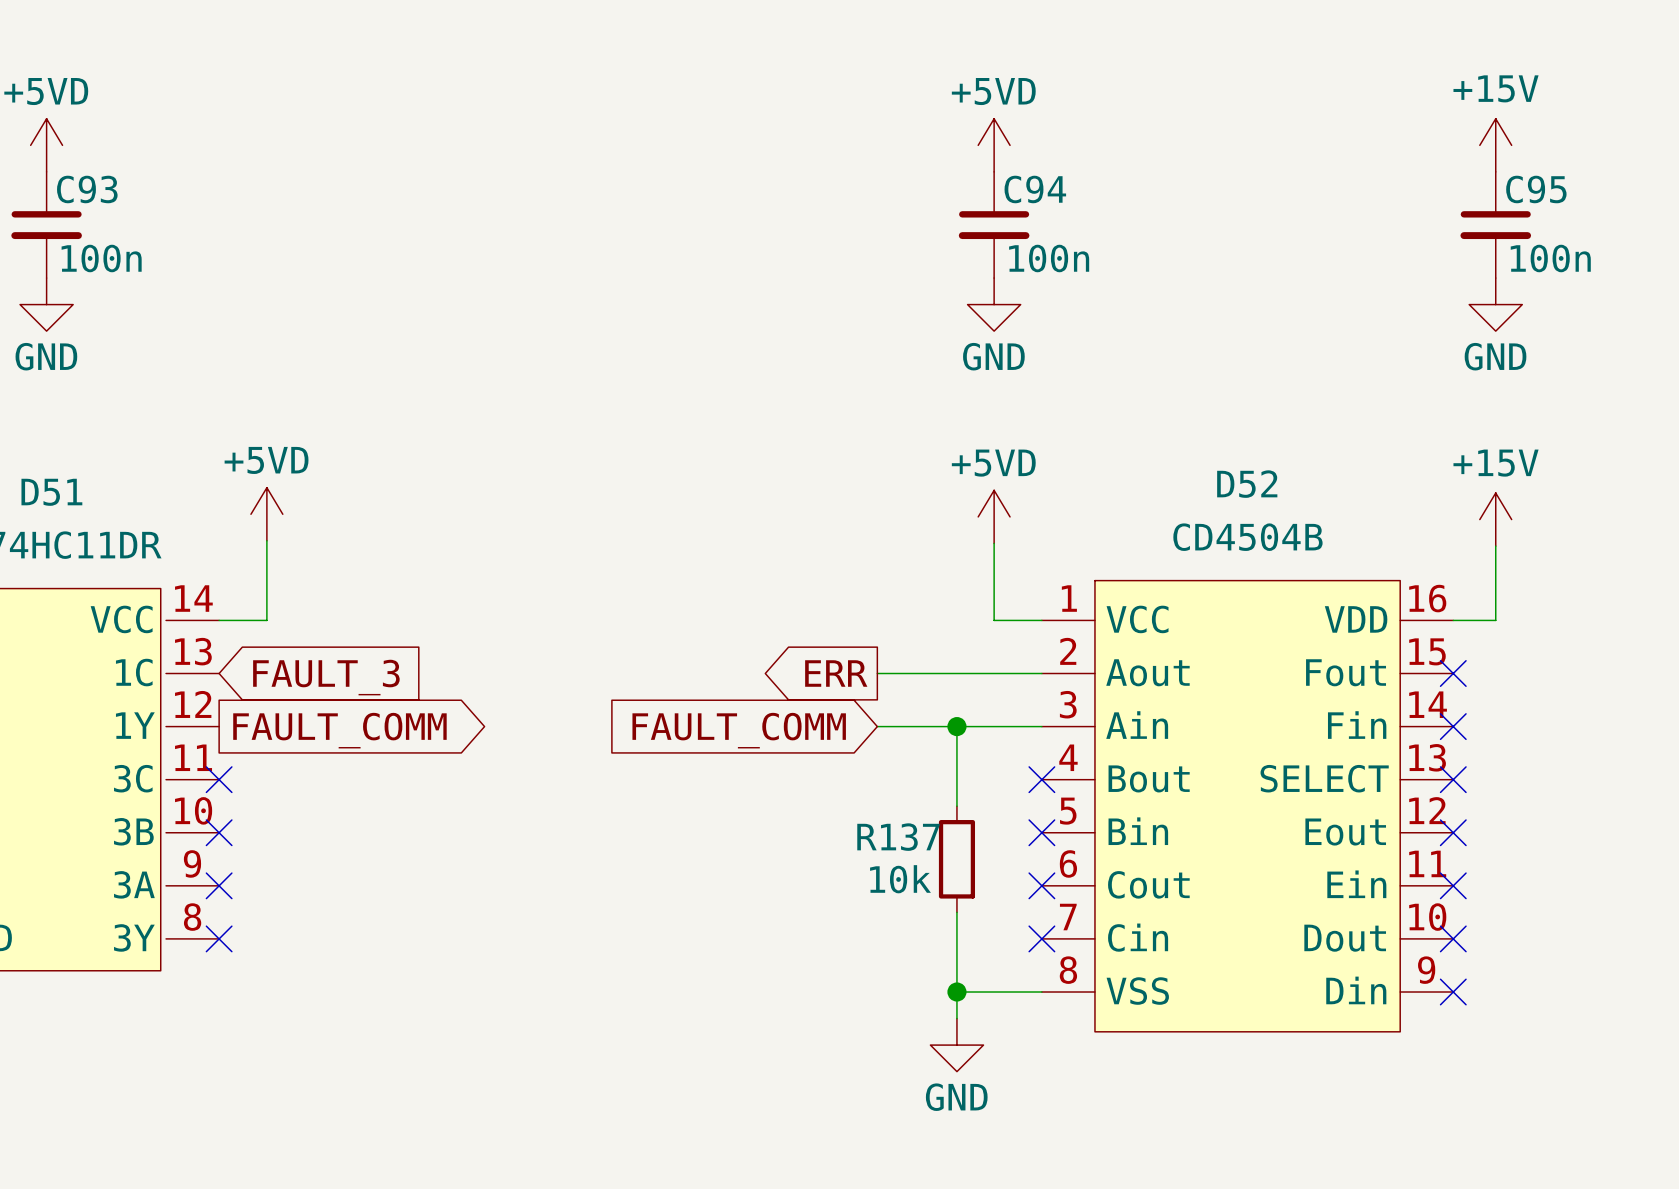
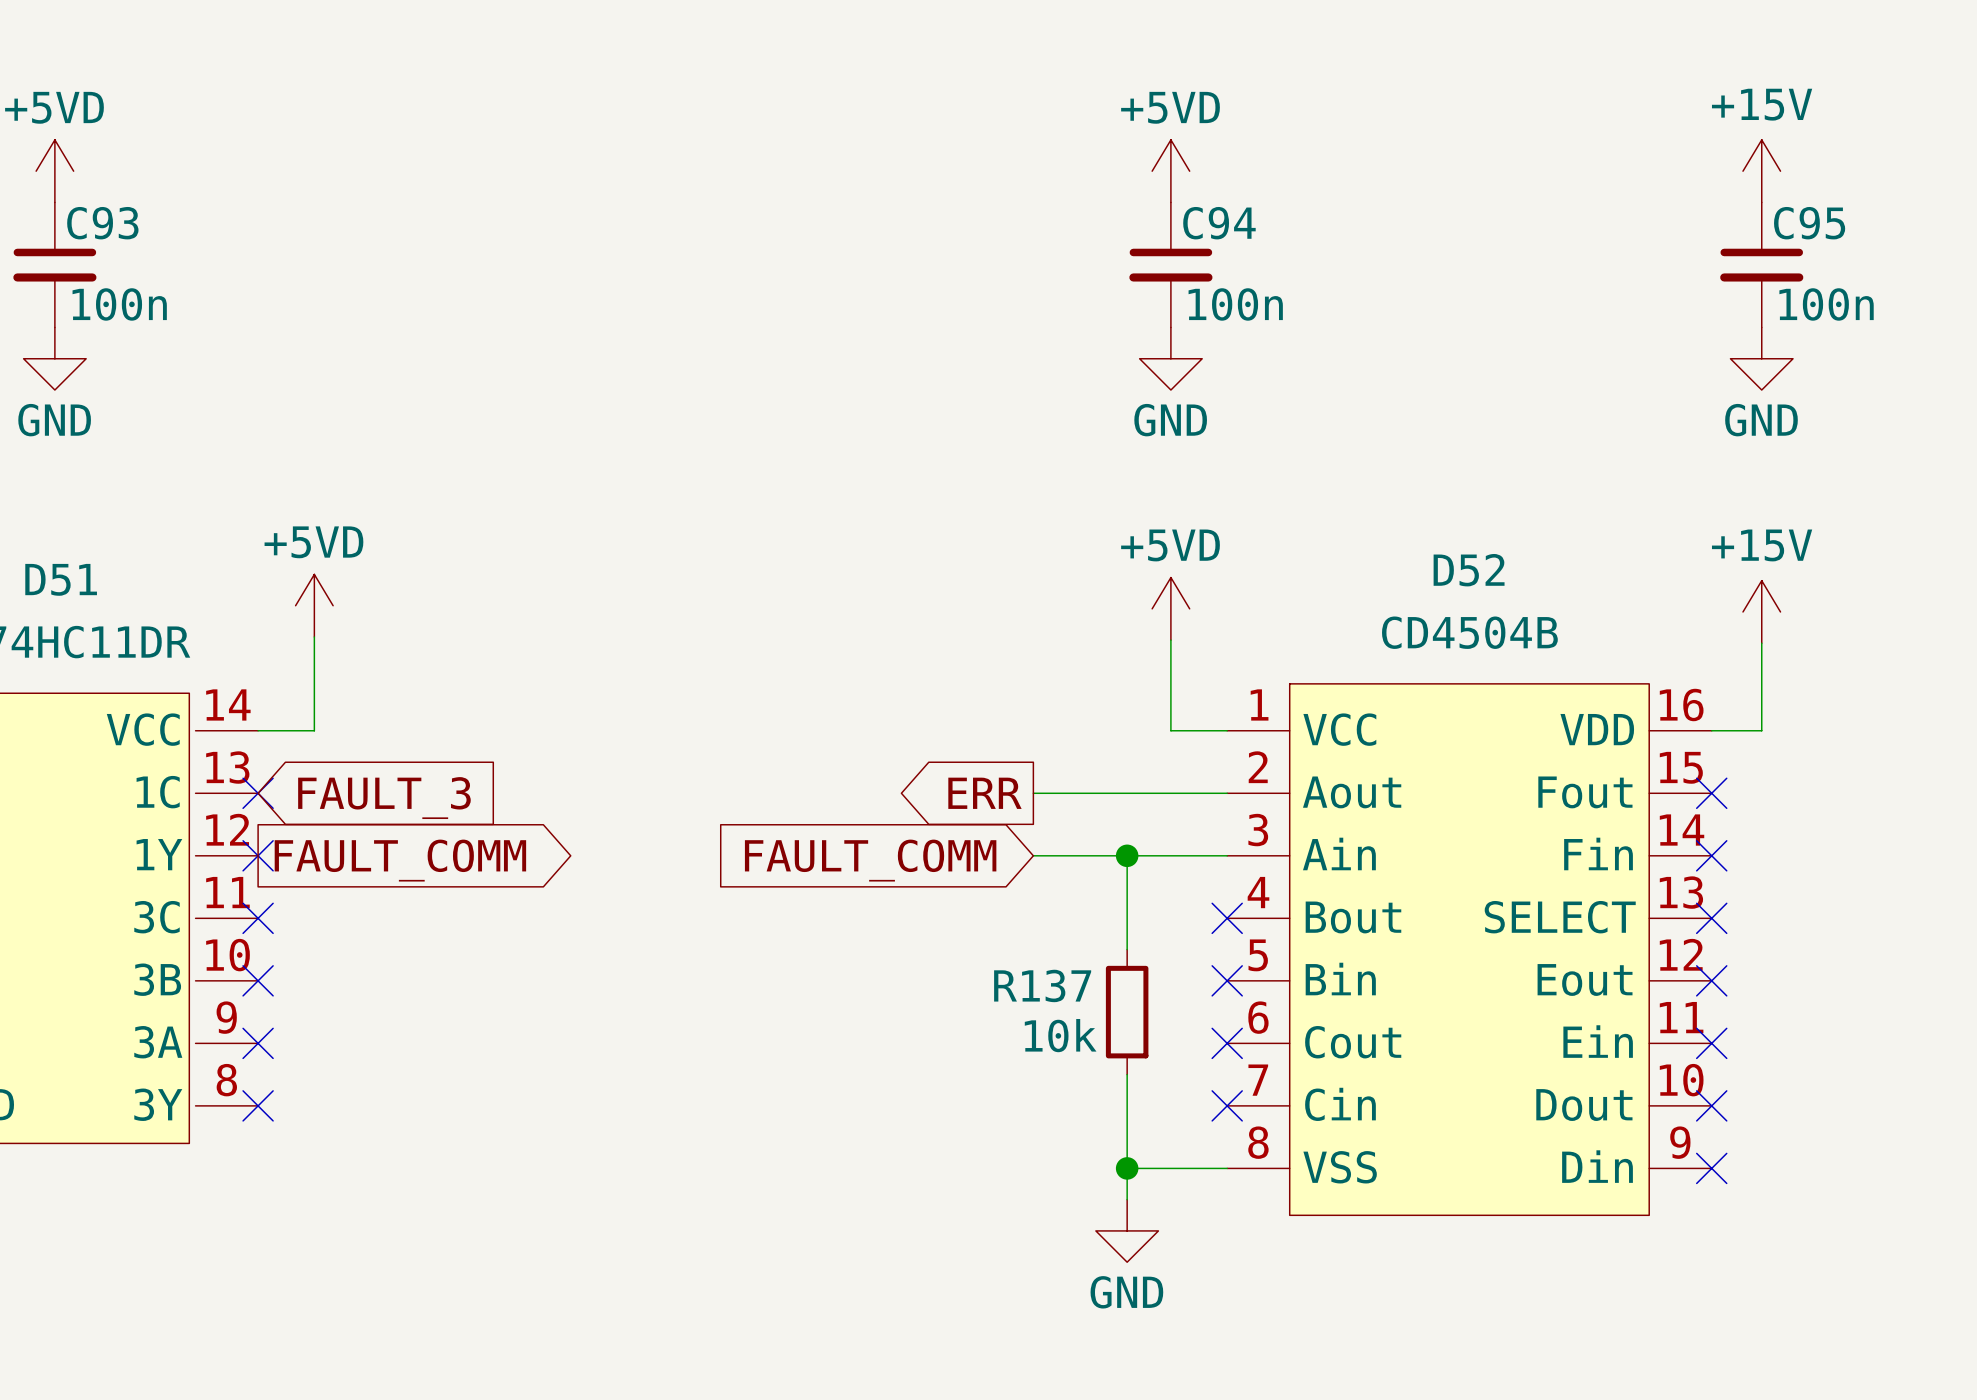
no-connect mark: none -> (258, 793)
no-connect mark: none -> (258, 855)
R137 name position: R137 (898, 837) -> R137 (1042, 985)

